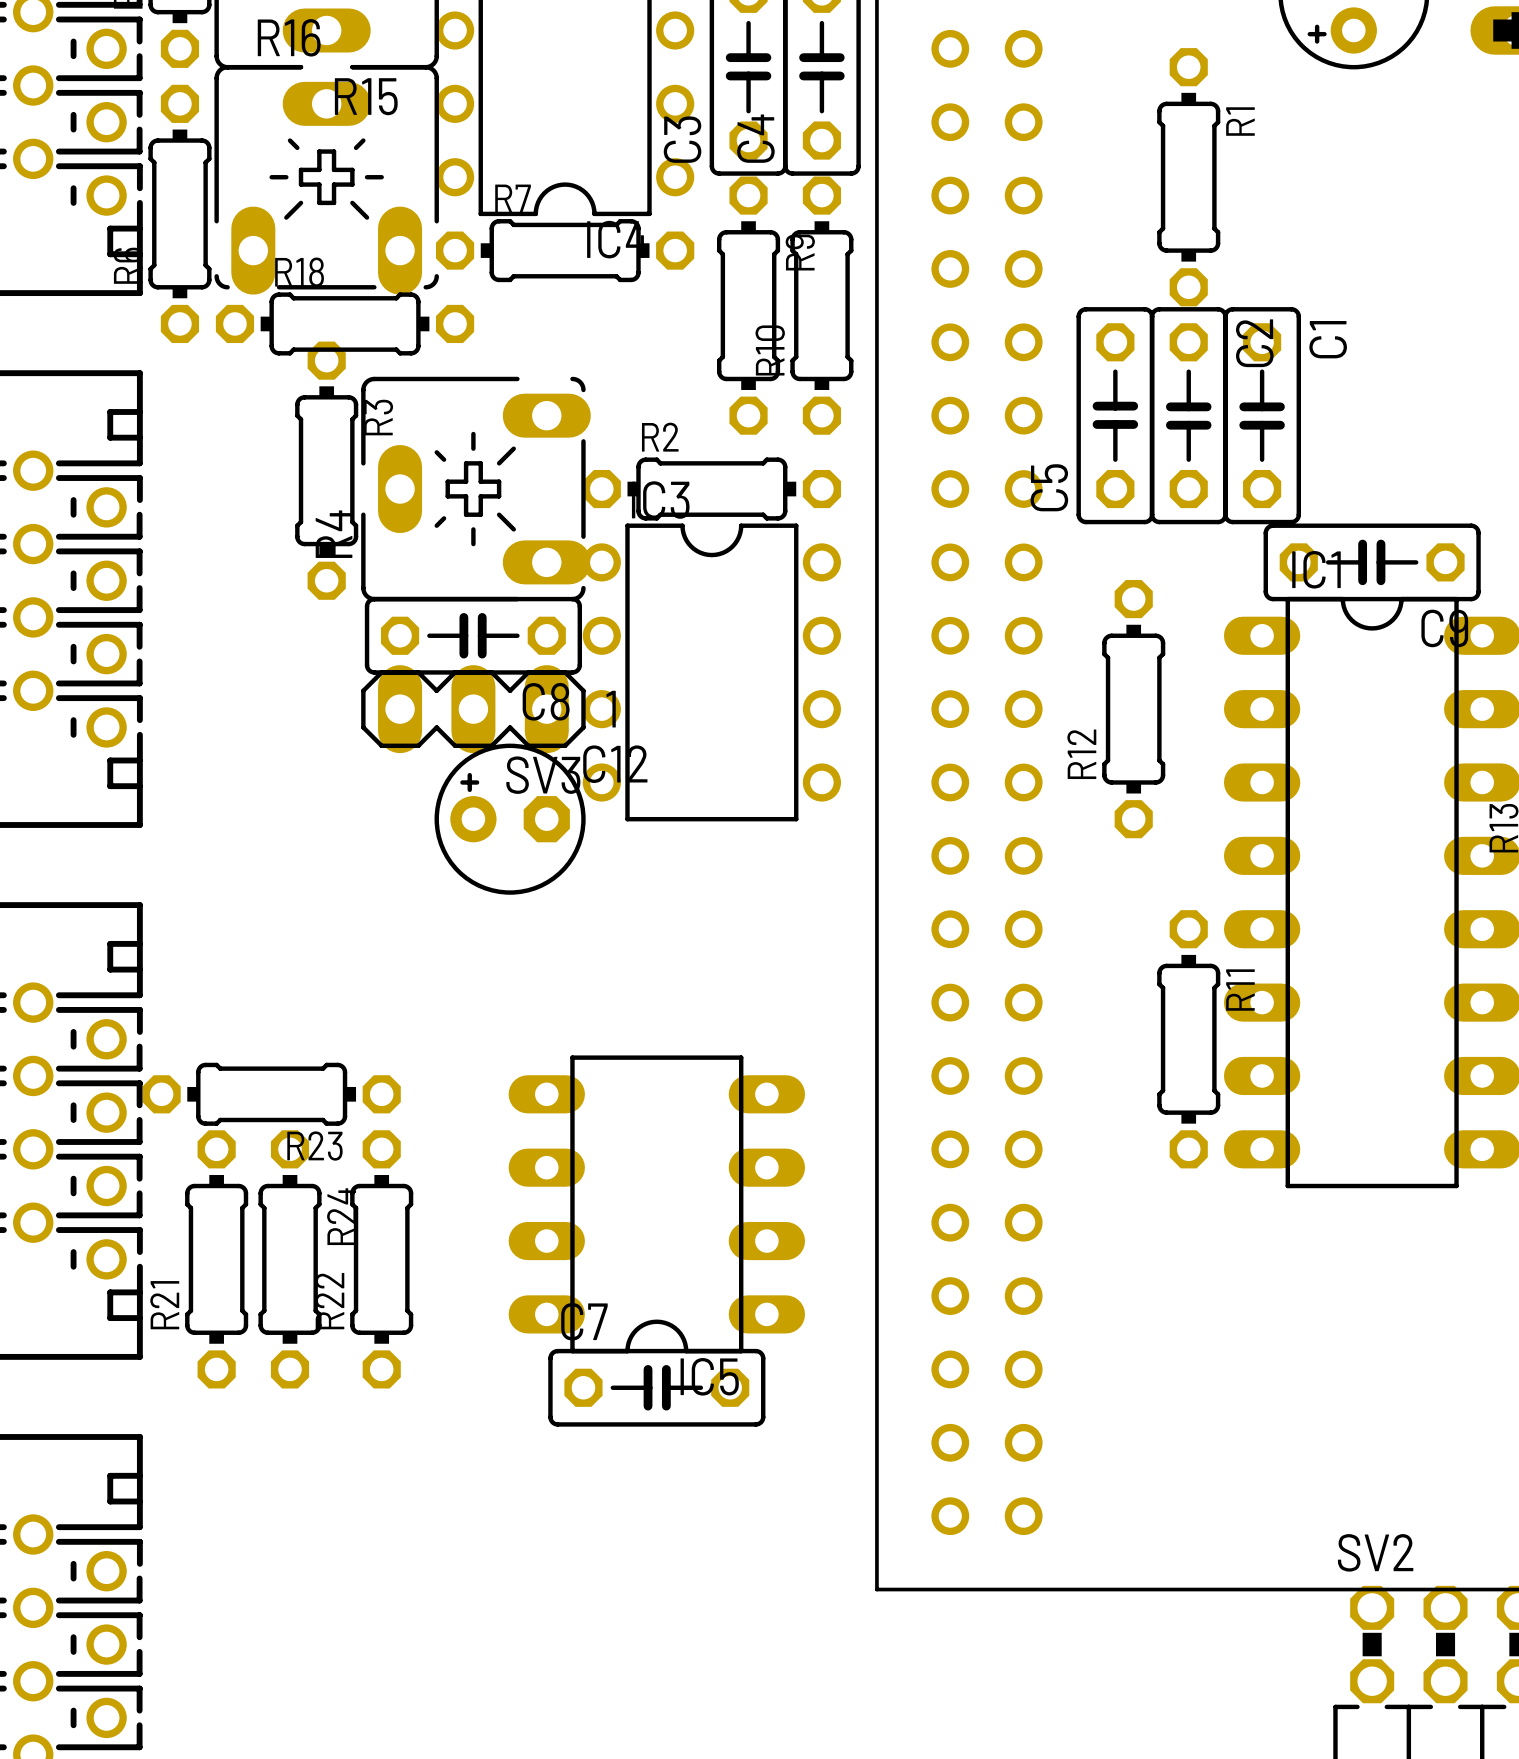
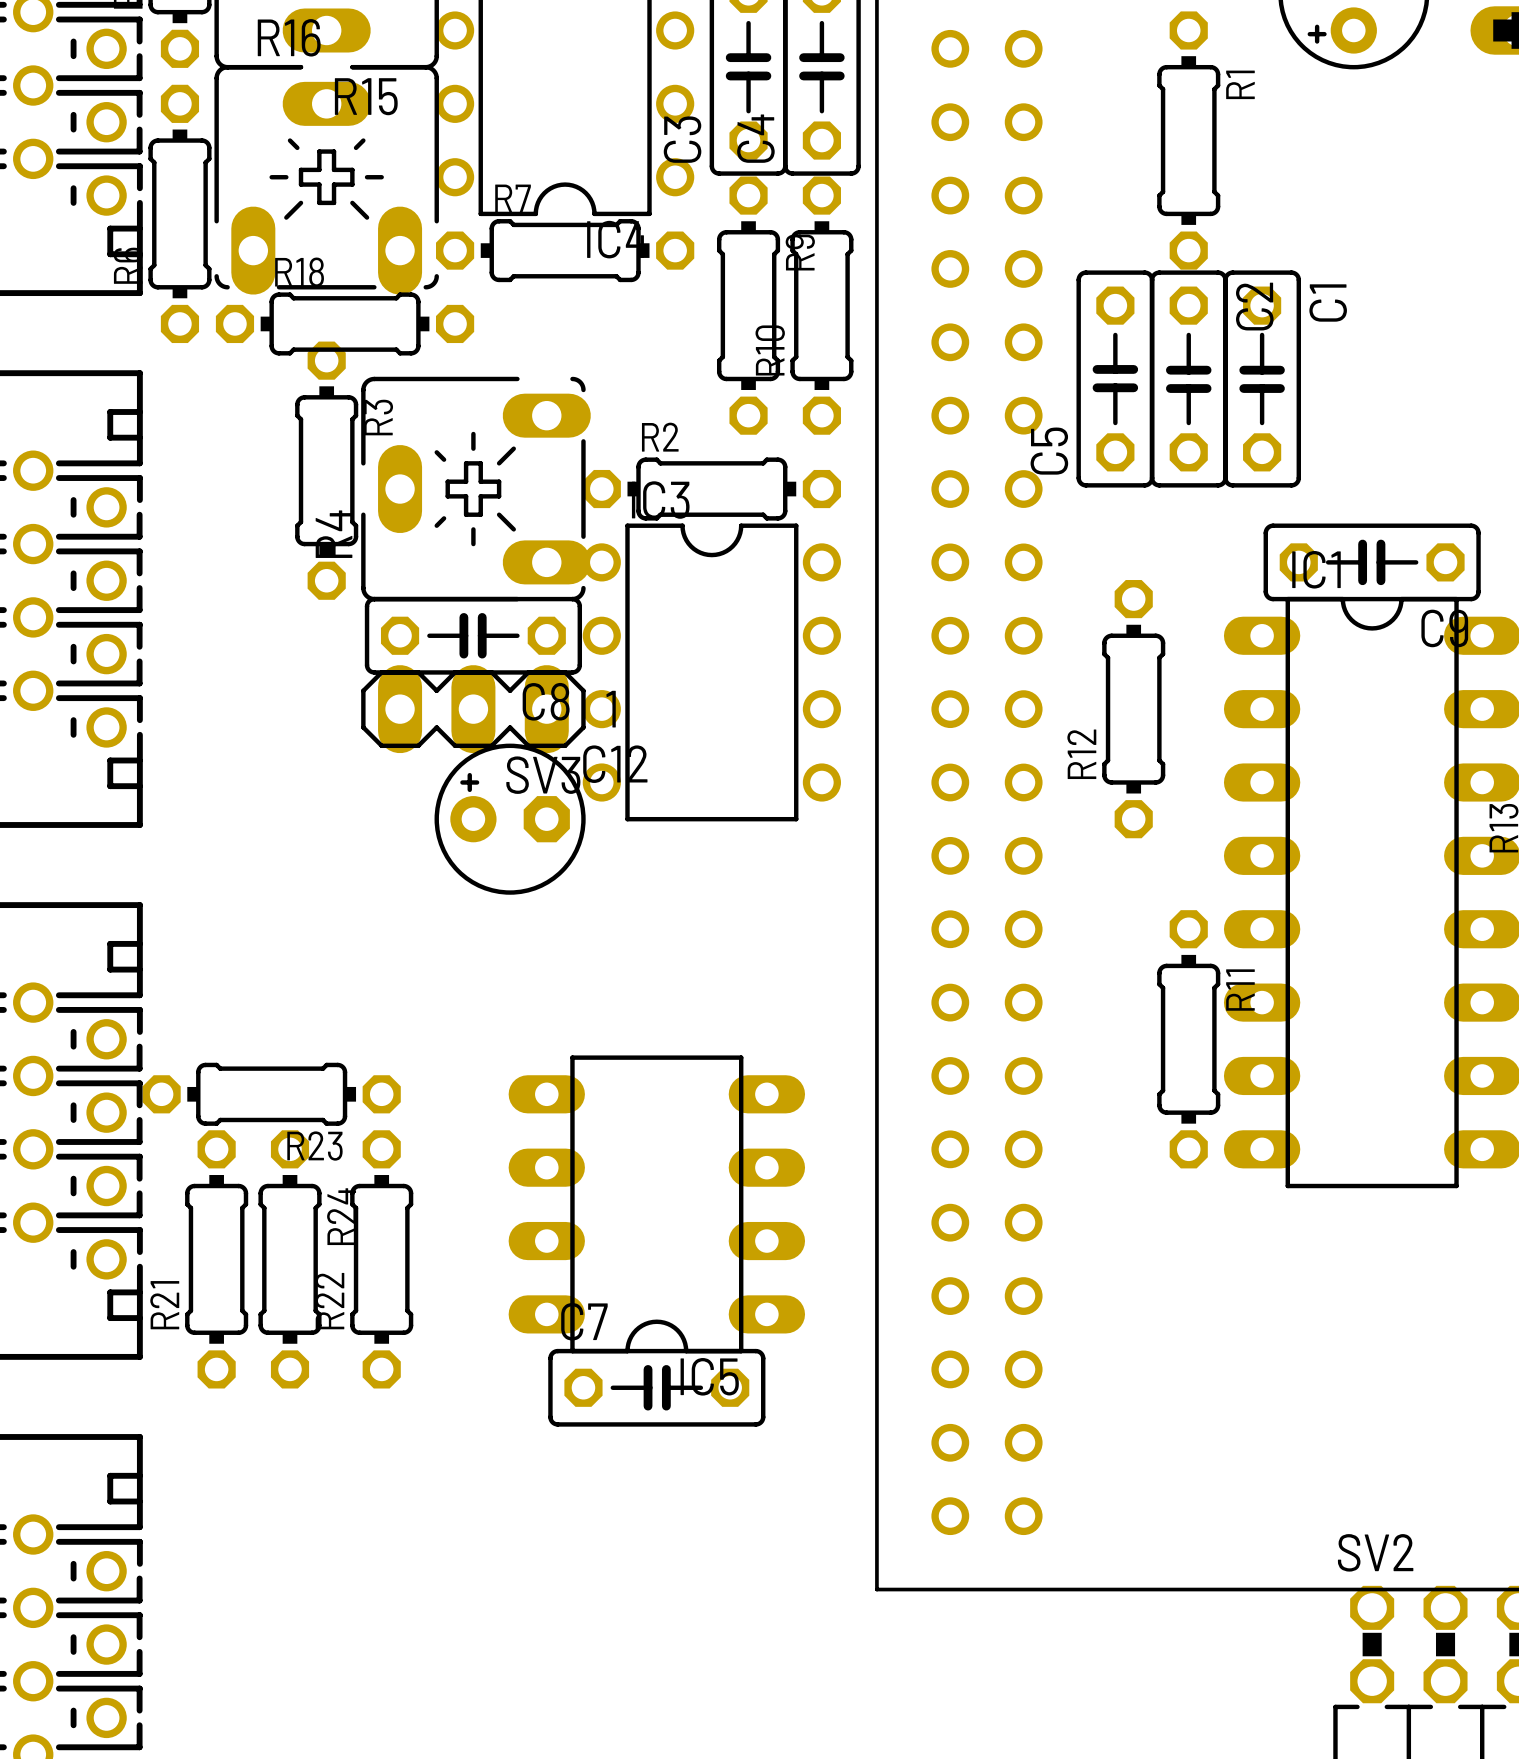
R1 position: (1188, 177) -> (1188, 140)
C5 position: (1115, 415) -> (1115, 378)
C2 position: (1188, 415) -> (1188, 378)
C1 position: (1262, 415) -> (1262, 378)

